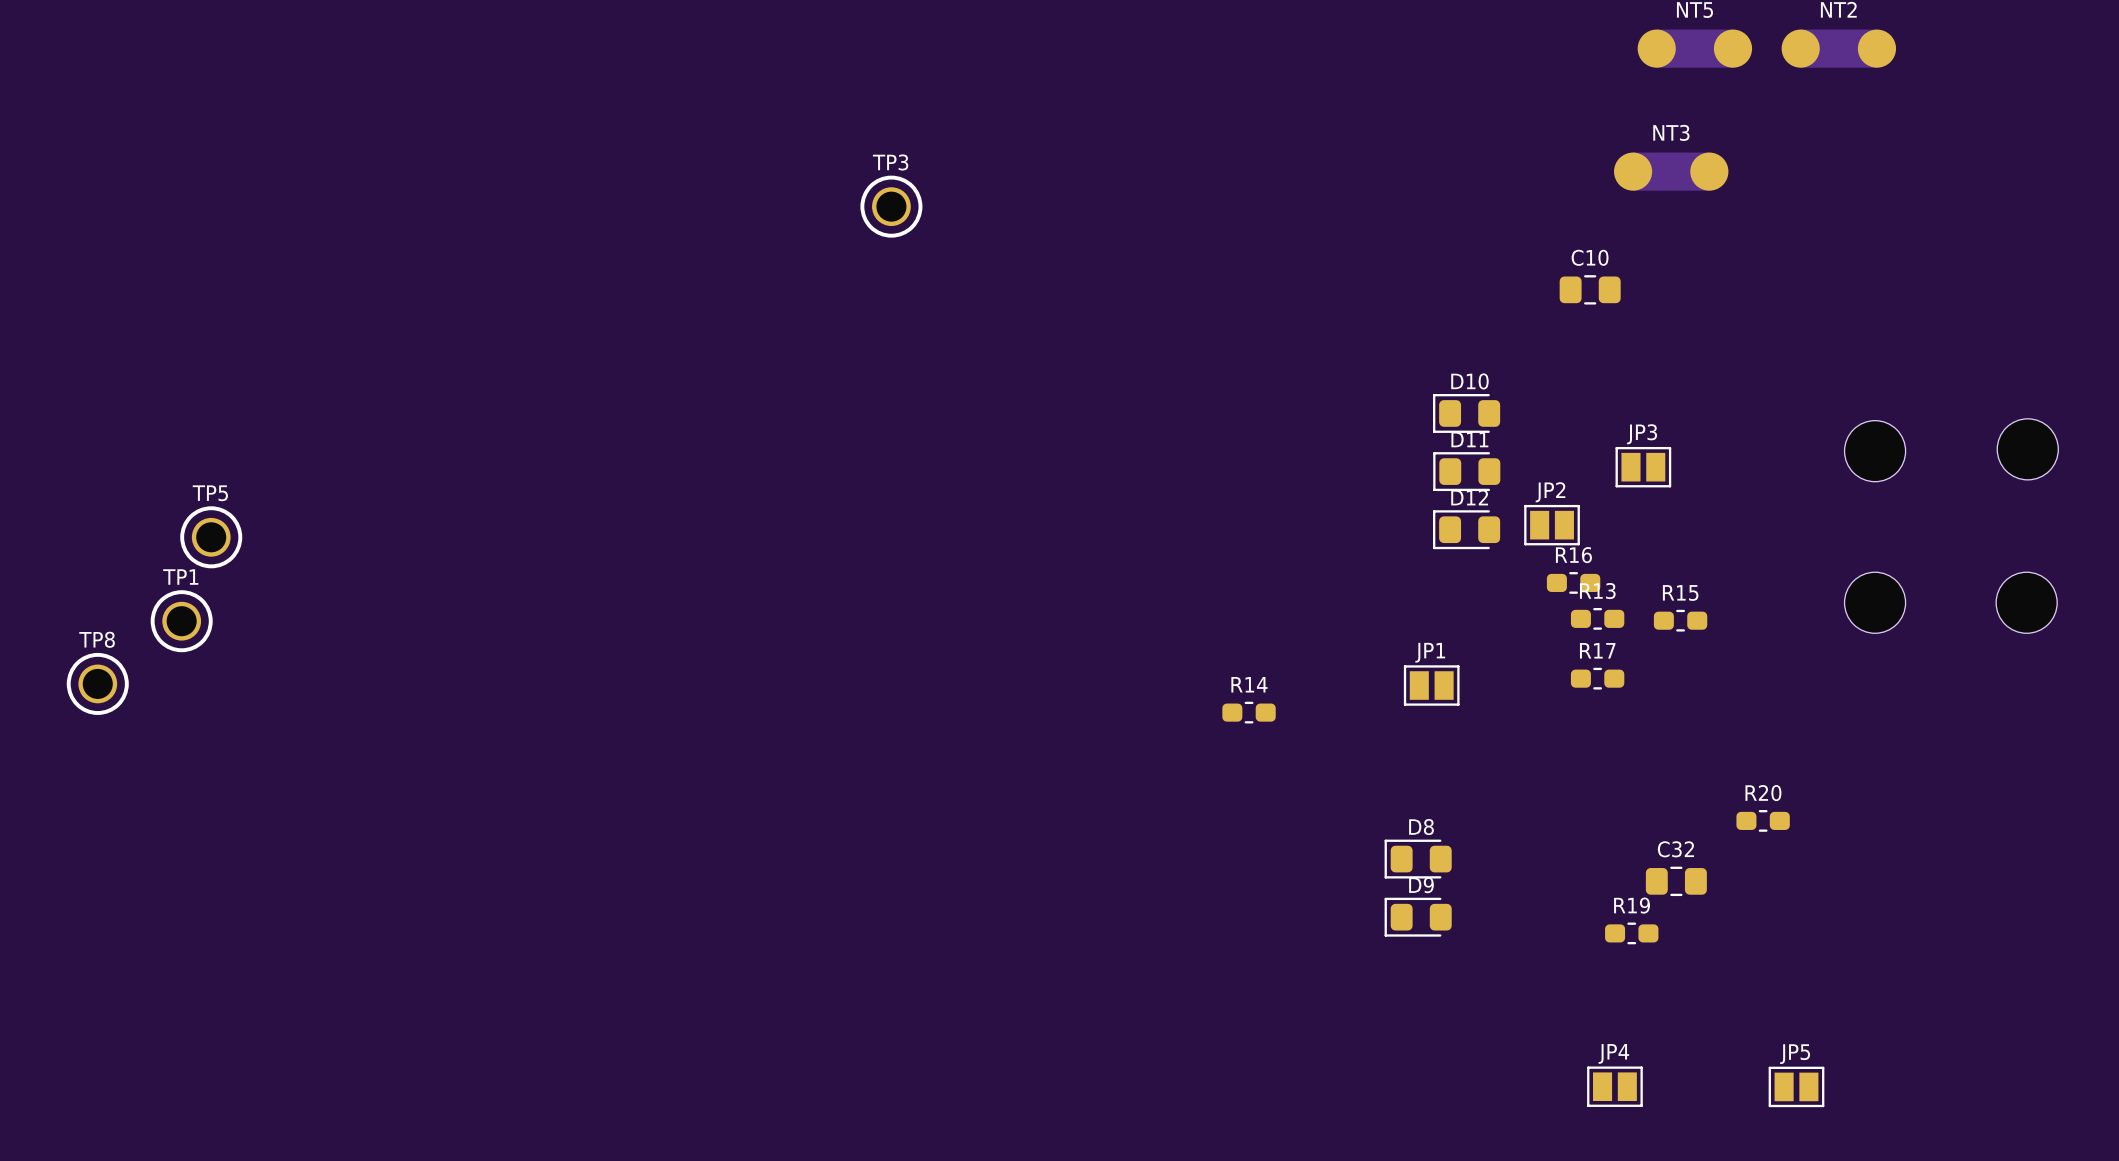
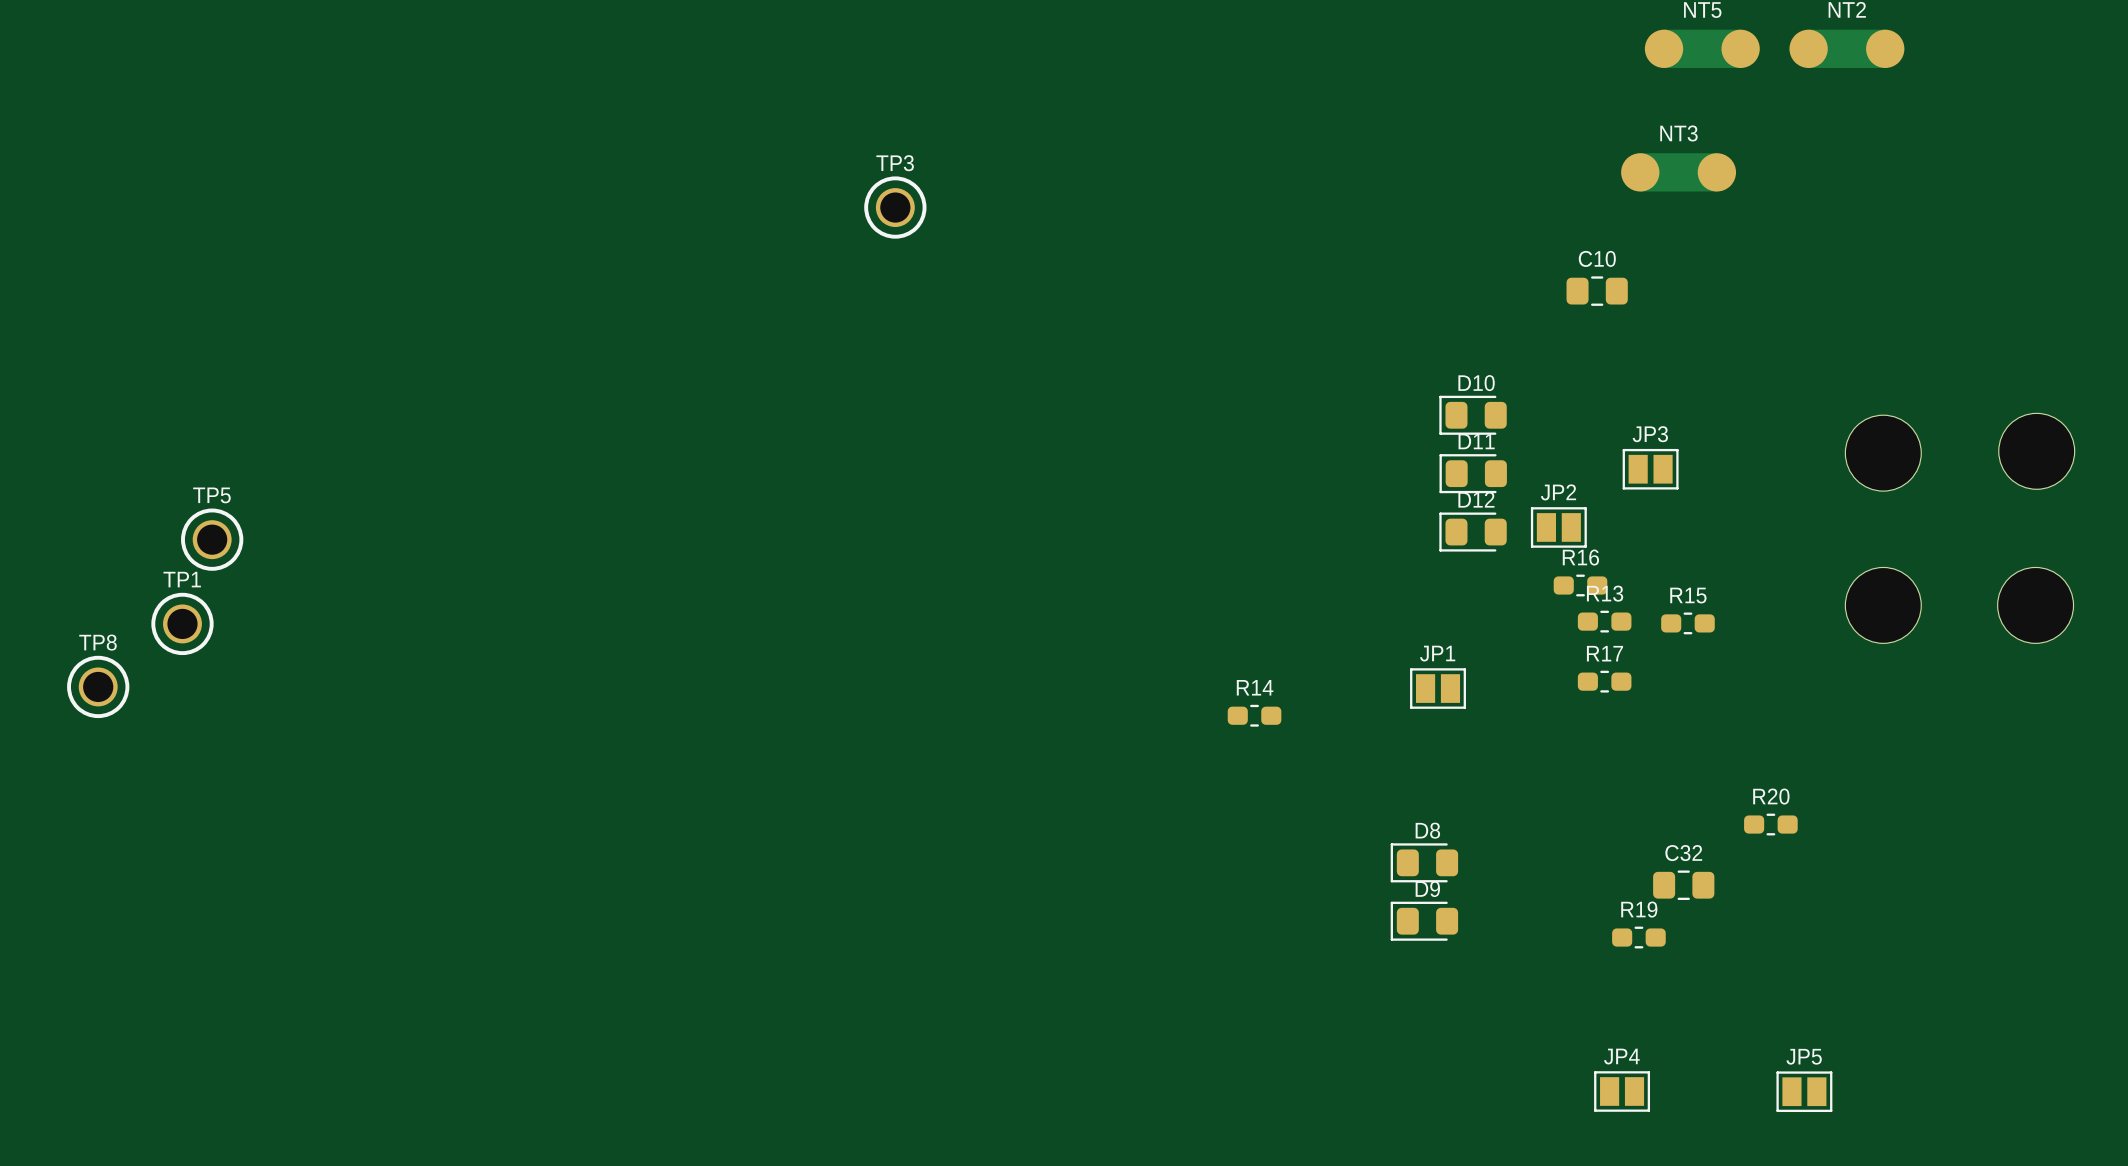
part footprint: [1997, 418, 2059, 480] -> [1998, 413, 2075, 490]
part footprint: [1844, 420, 1906, 482] -> [1845, 415, 1922, 492]
part footprint: [1844, 572, 1906, 634] -> [1845, 567, 1922, 644]
part footprint: [1996, 572, 2058, 634] -> [1997, 567, 2074, 644]

